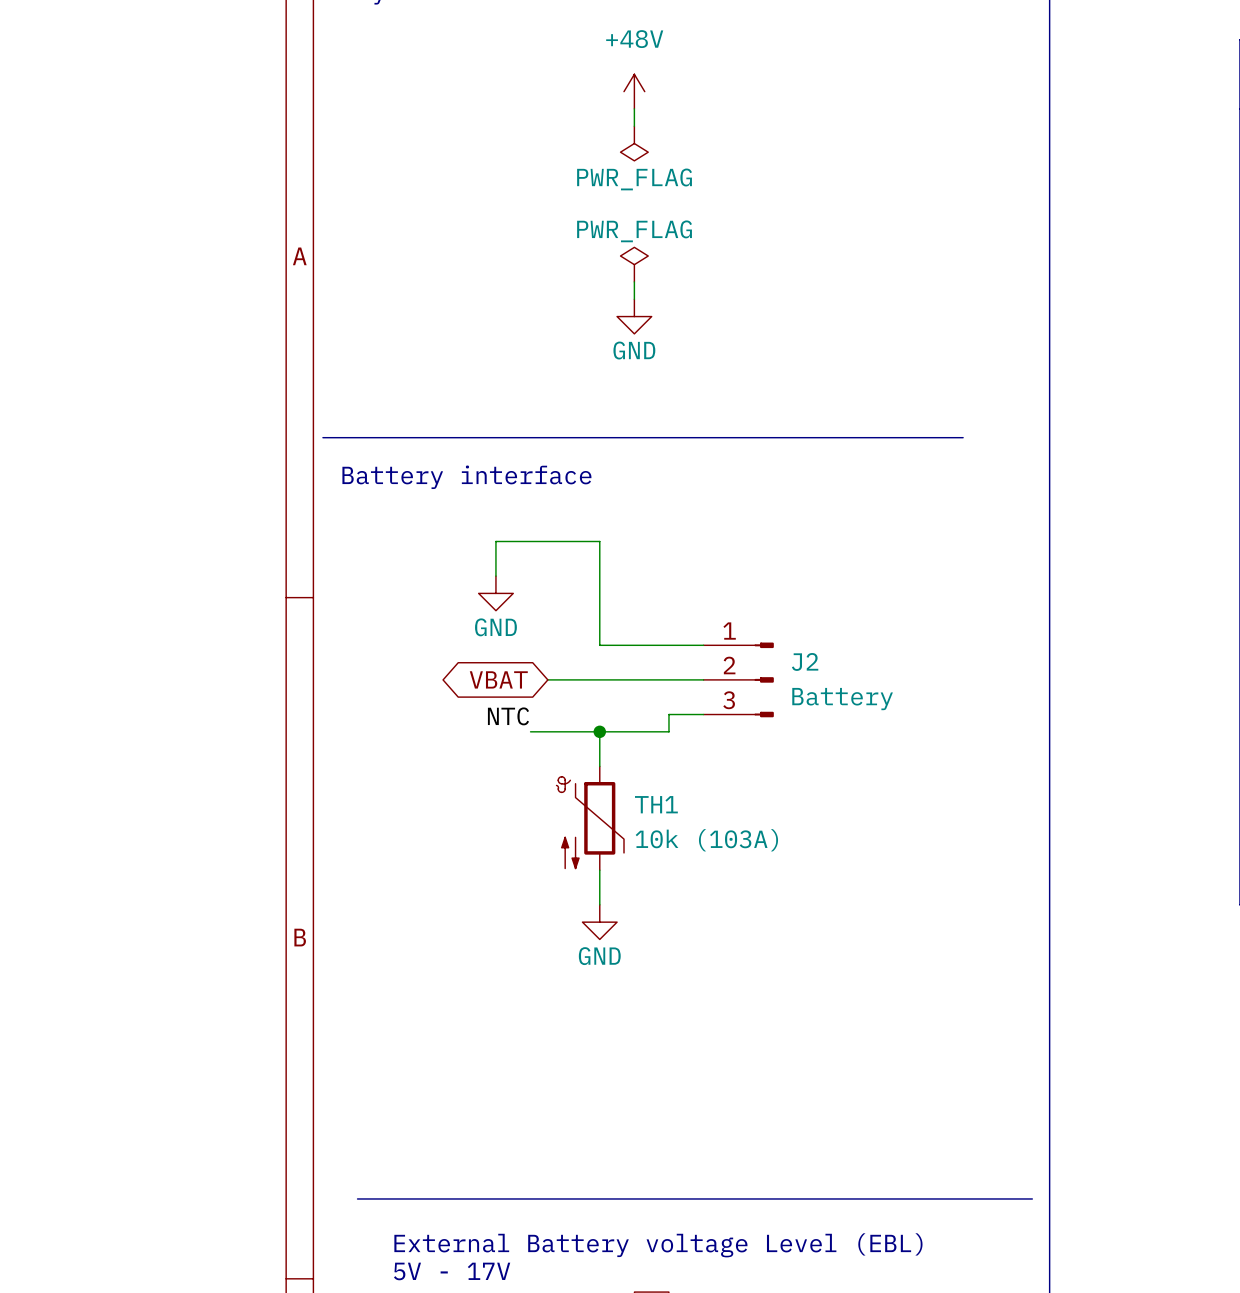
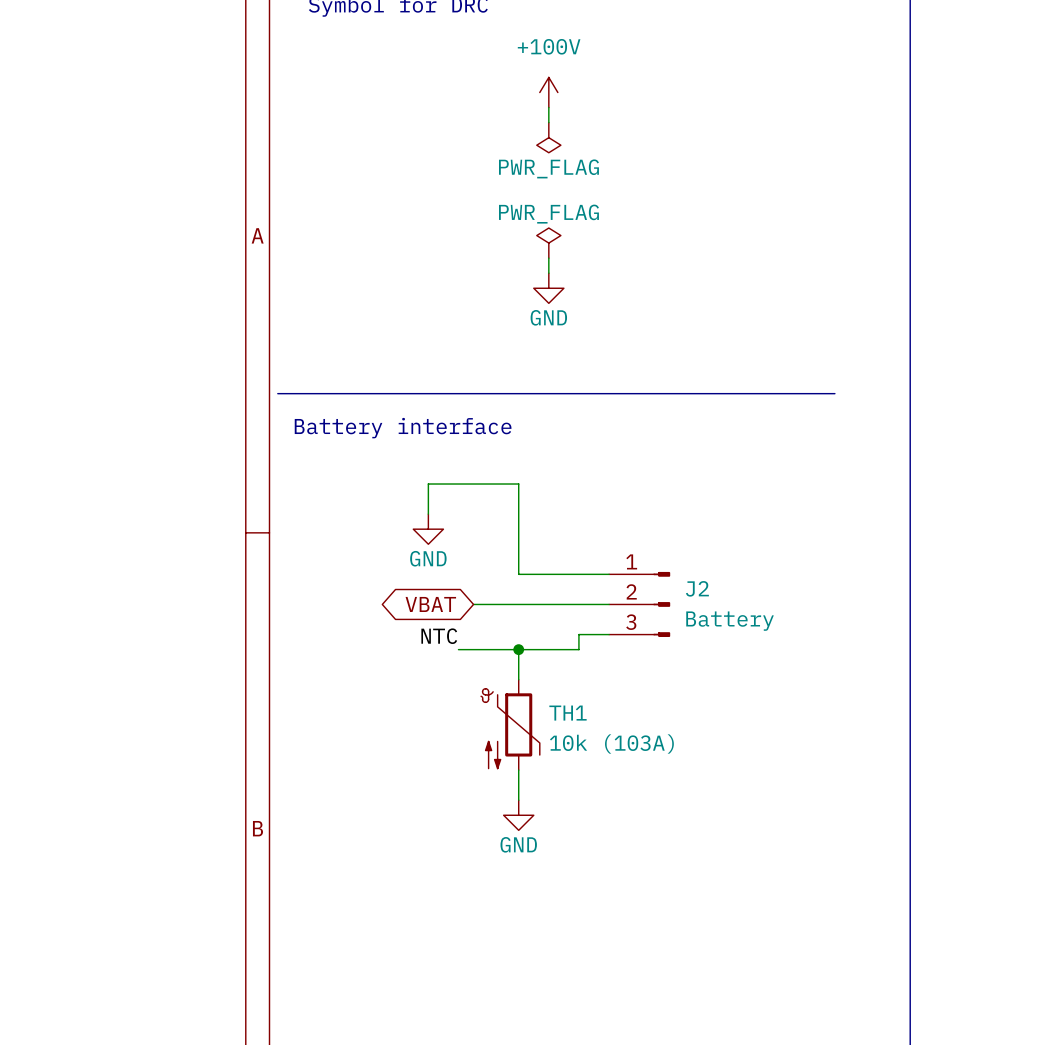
power symbol: +48V (634, 91) -> +100V (548, 92)

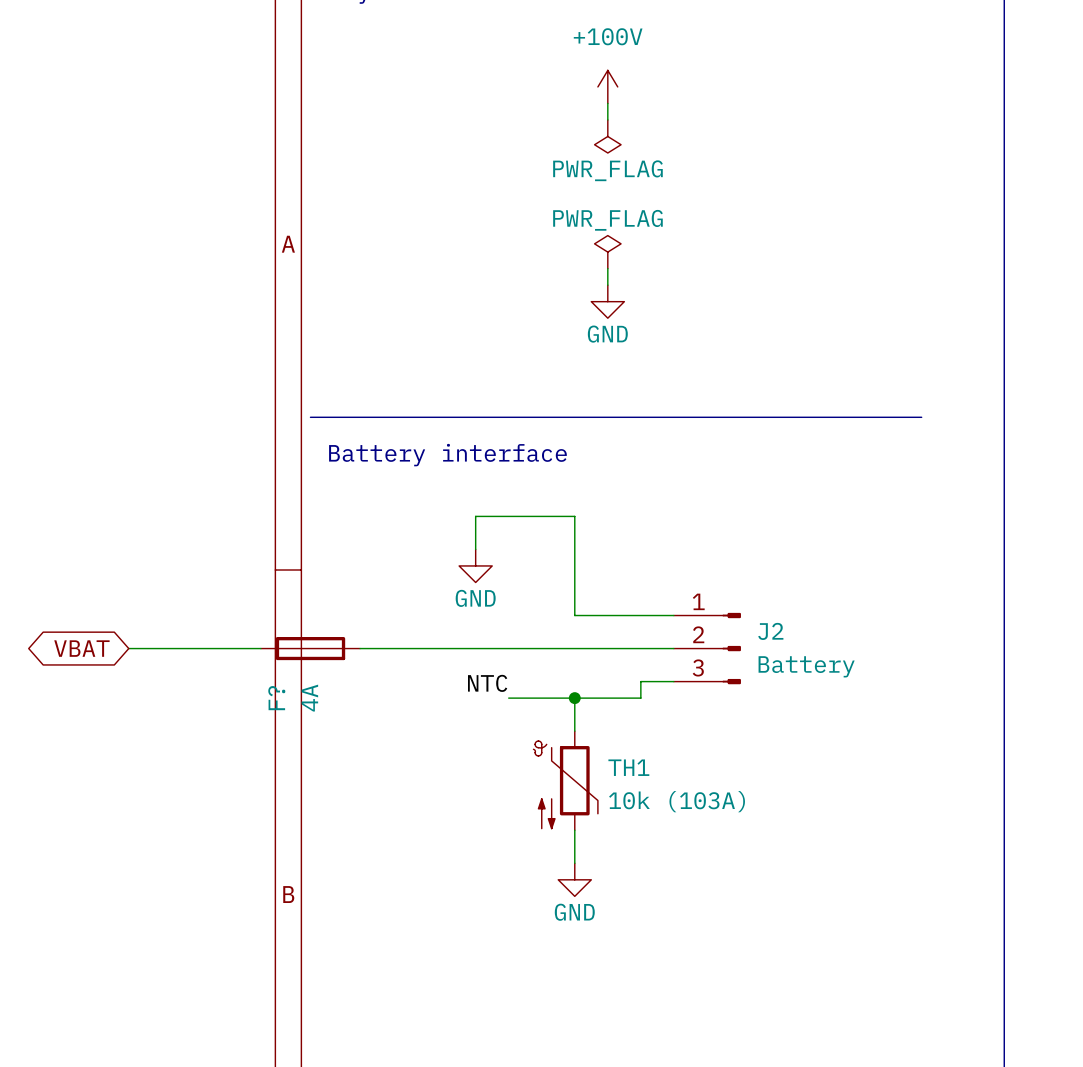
global label: none -> VBAT (81, 648)
wire: none -> (128, 648) (260, 648)
F?: none -> 4A (310, 648)
wire: none -> (360, 648) (525, 648)
global label: VBAT (430, 604) -> none

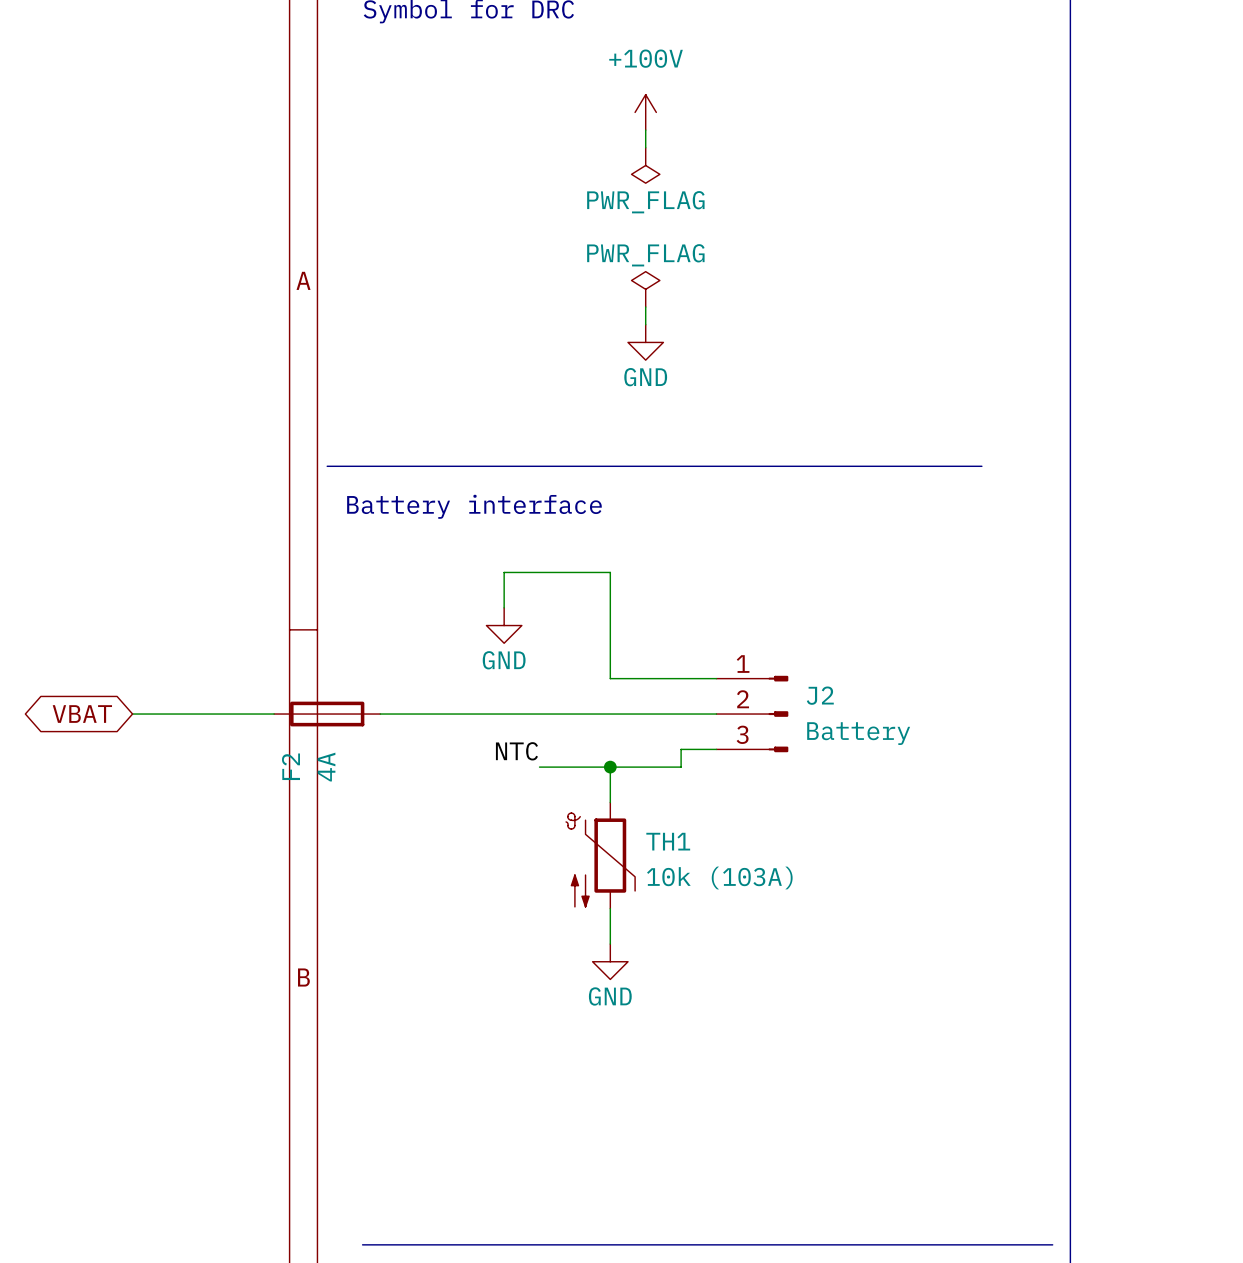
F? name: F? (276, 698) -> F2 (291, 766)

